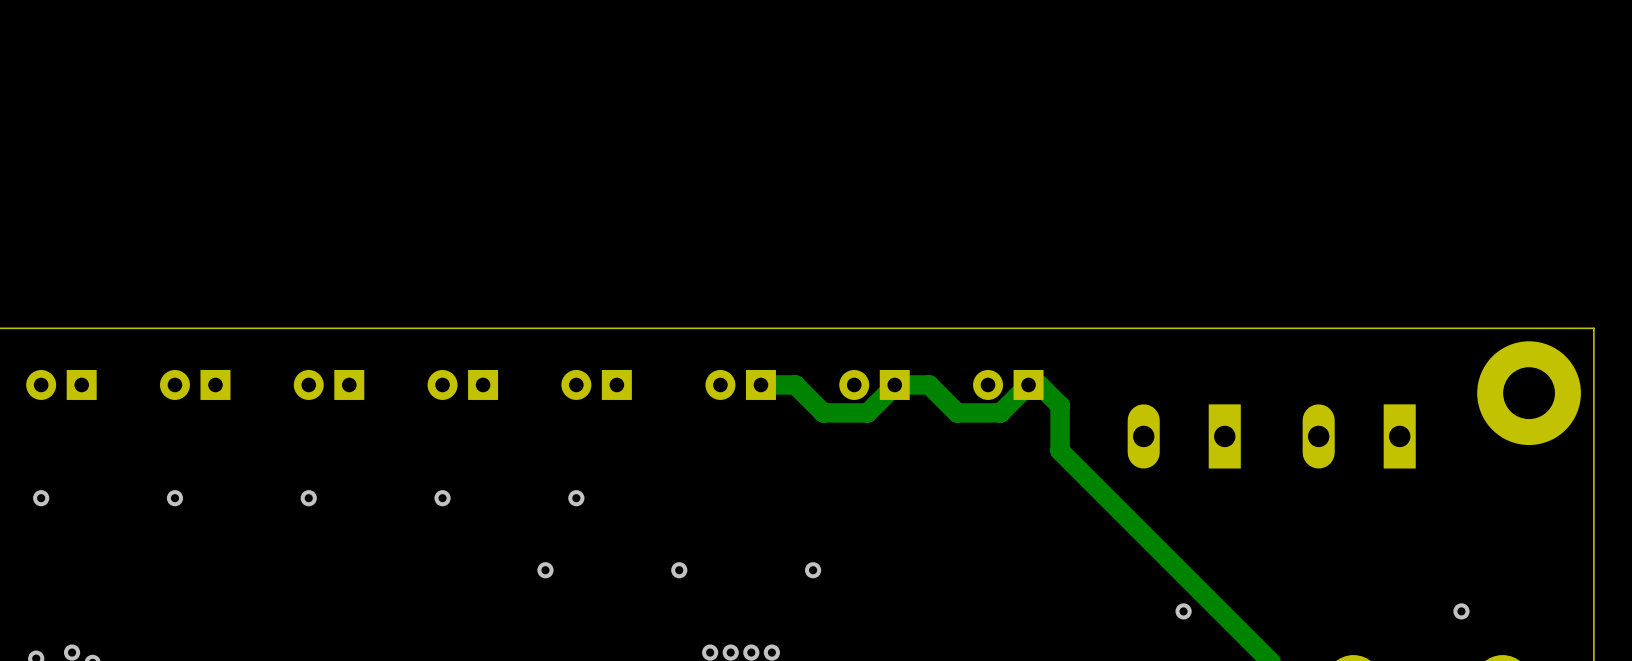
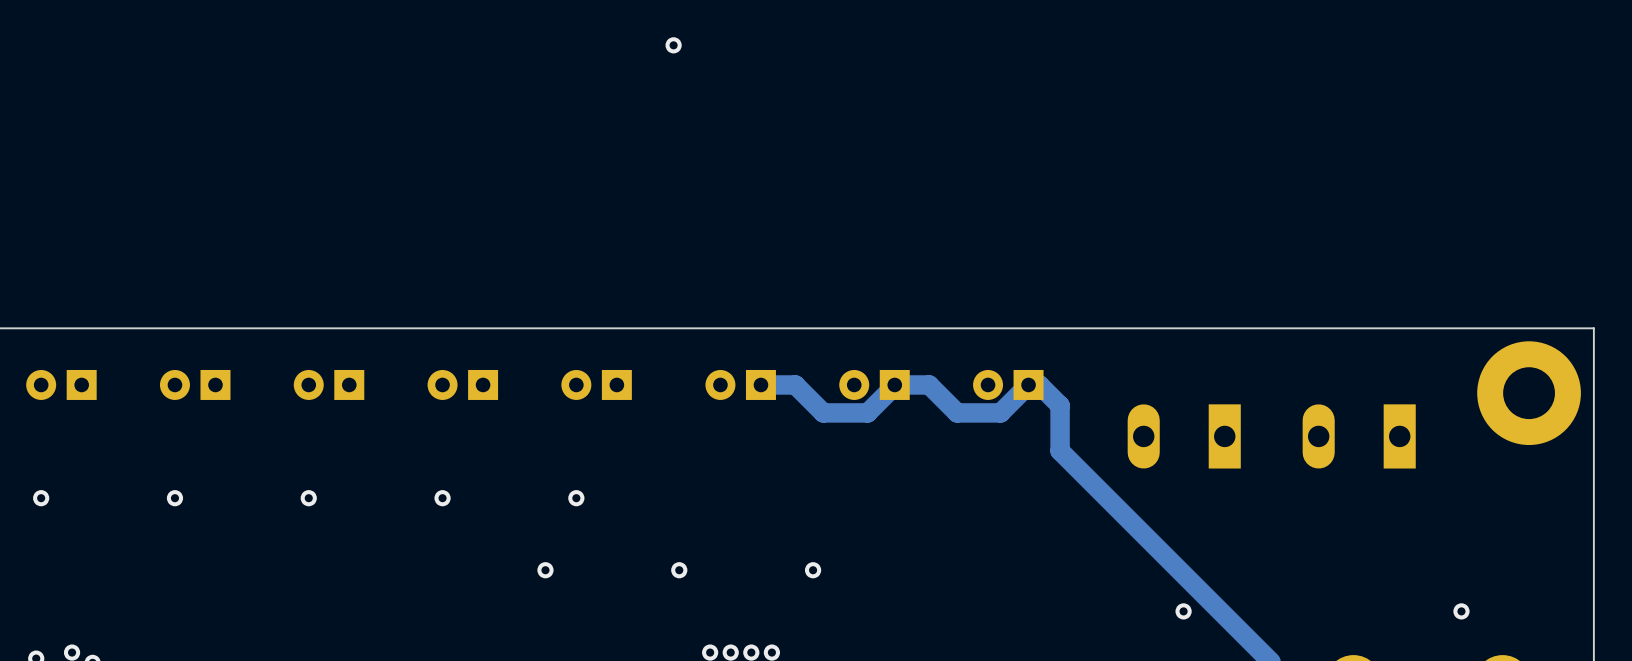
via: none -> (673, 45)

